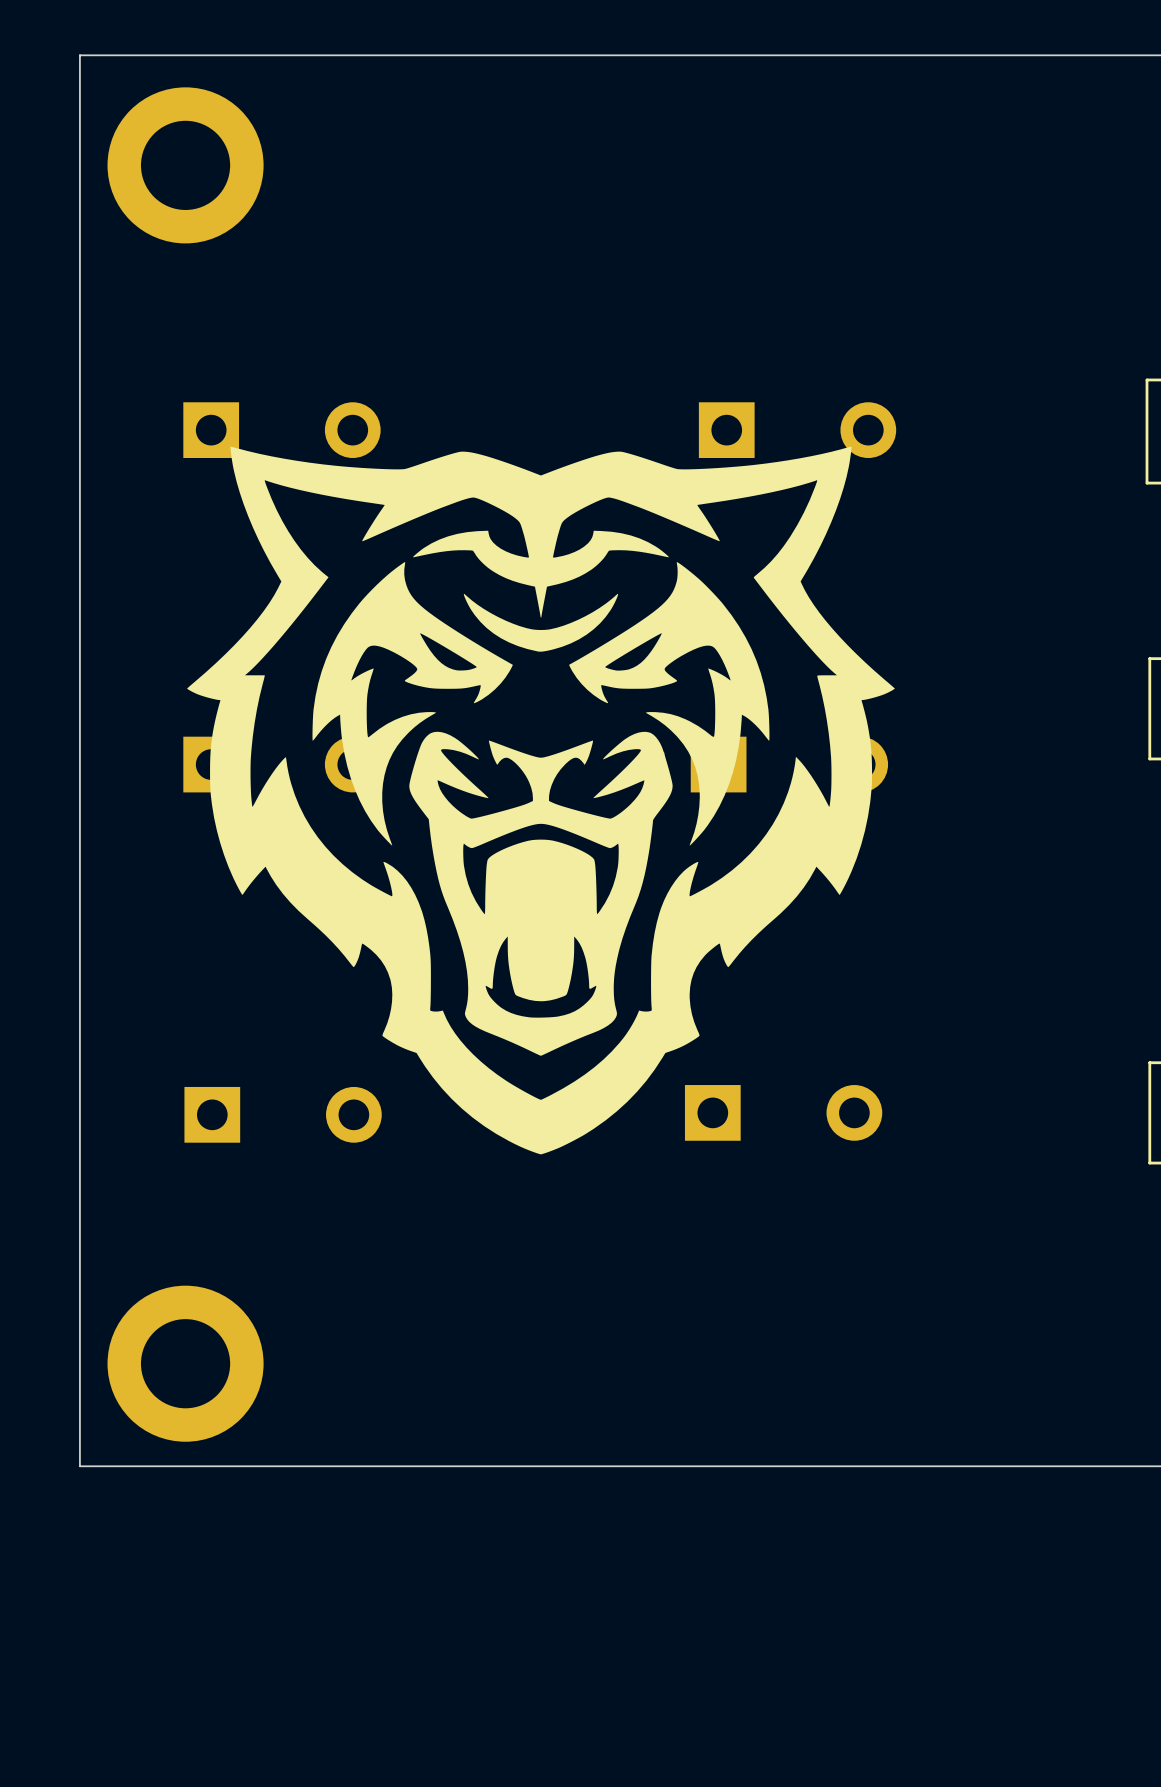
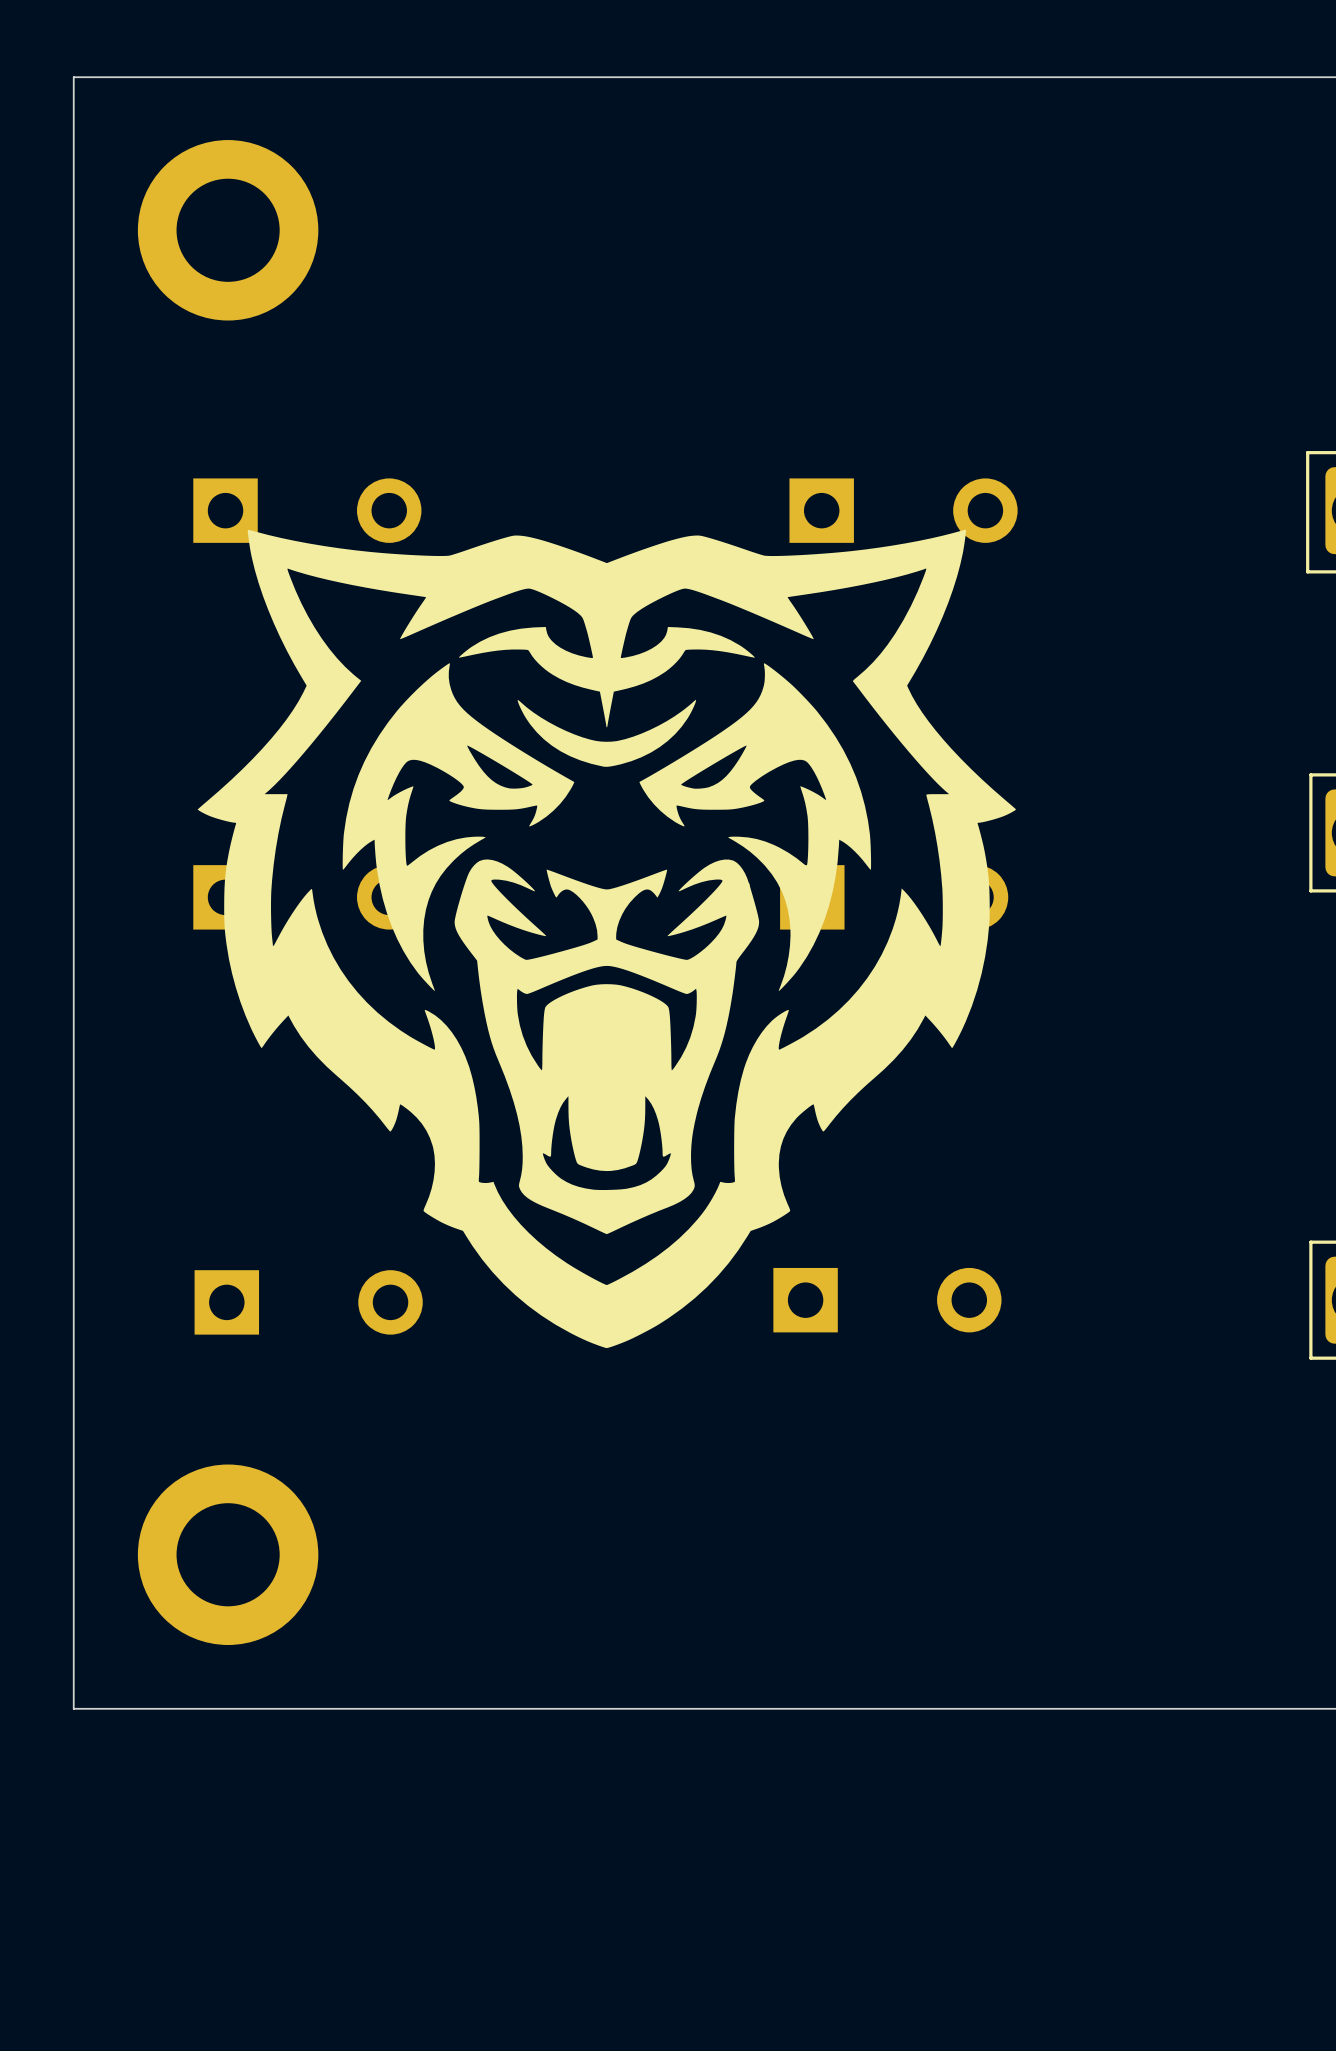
part position: (185, 165) -> (228, 230)
part position: (185, 1363) -> (228, 1554)

